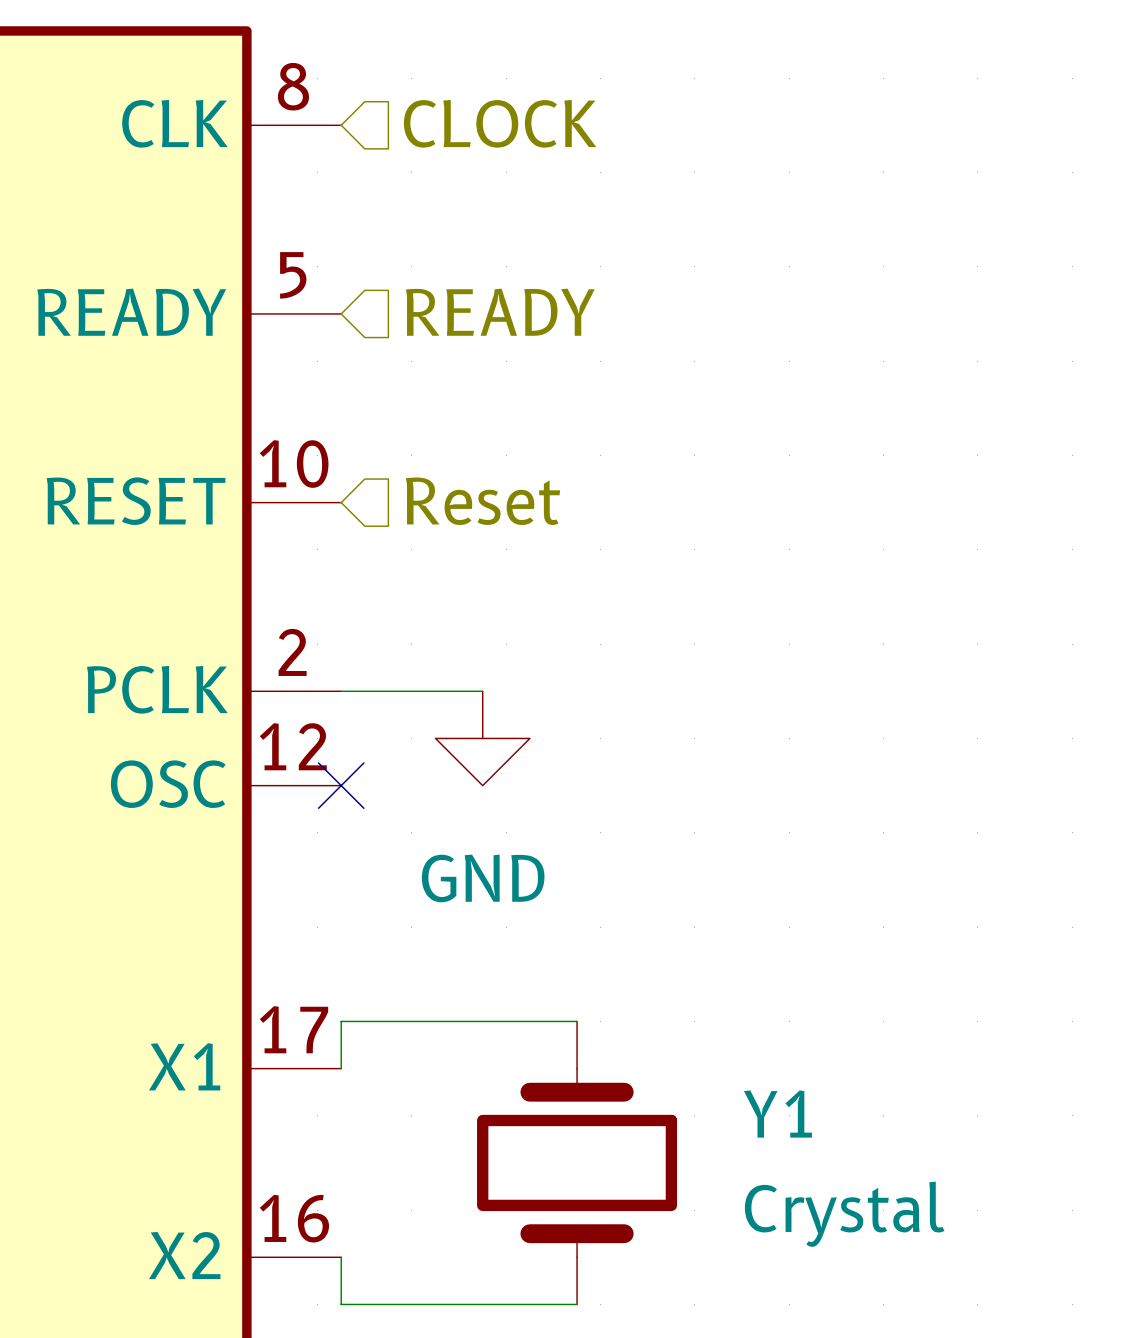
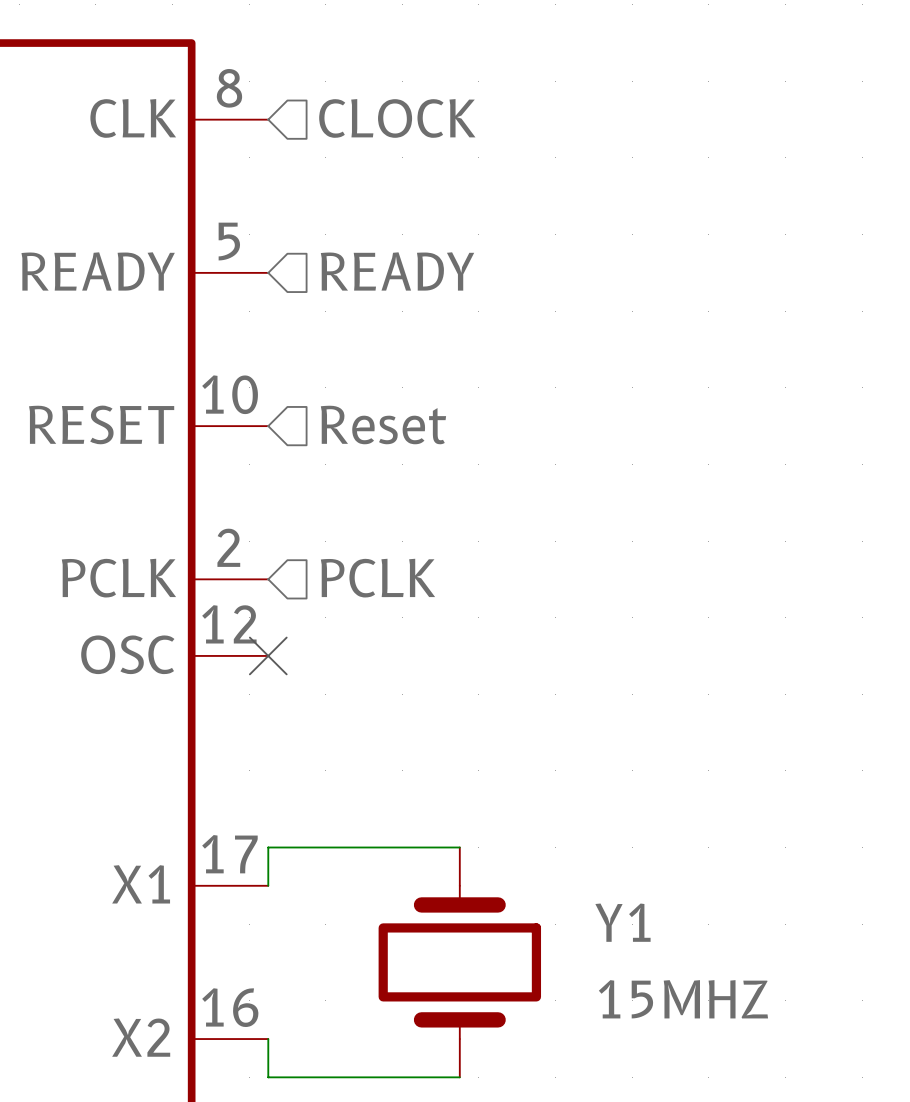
hierarchical label: none -> PCLK (377, 578)
wire: (341, 691) (482, 691) -> none
power symbol: GND (482, 738) -> none
Y1 value: Crystal (844, 1214) -> 15MHZ (683, 999)

